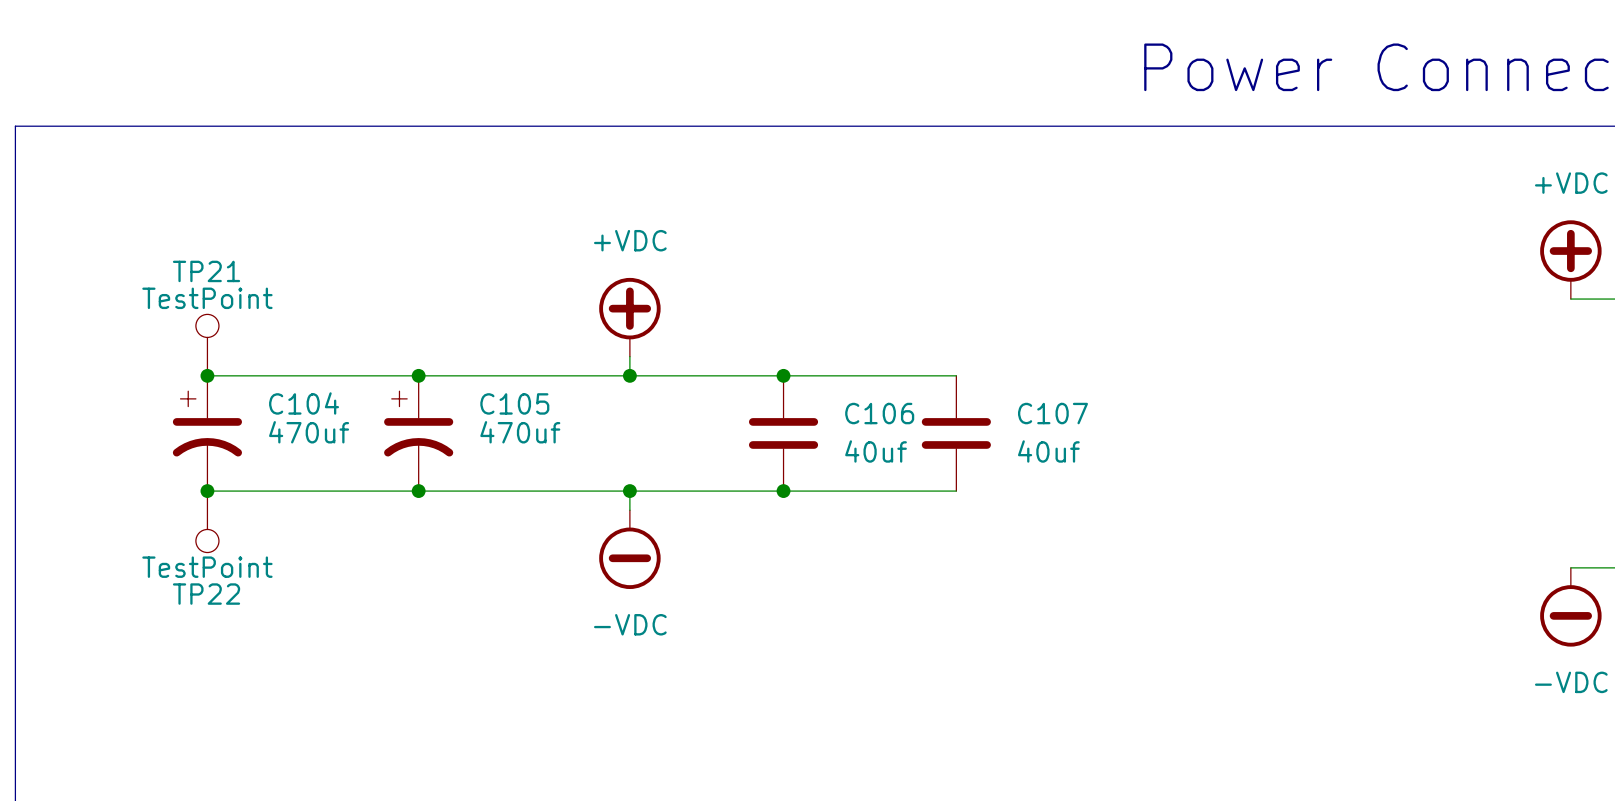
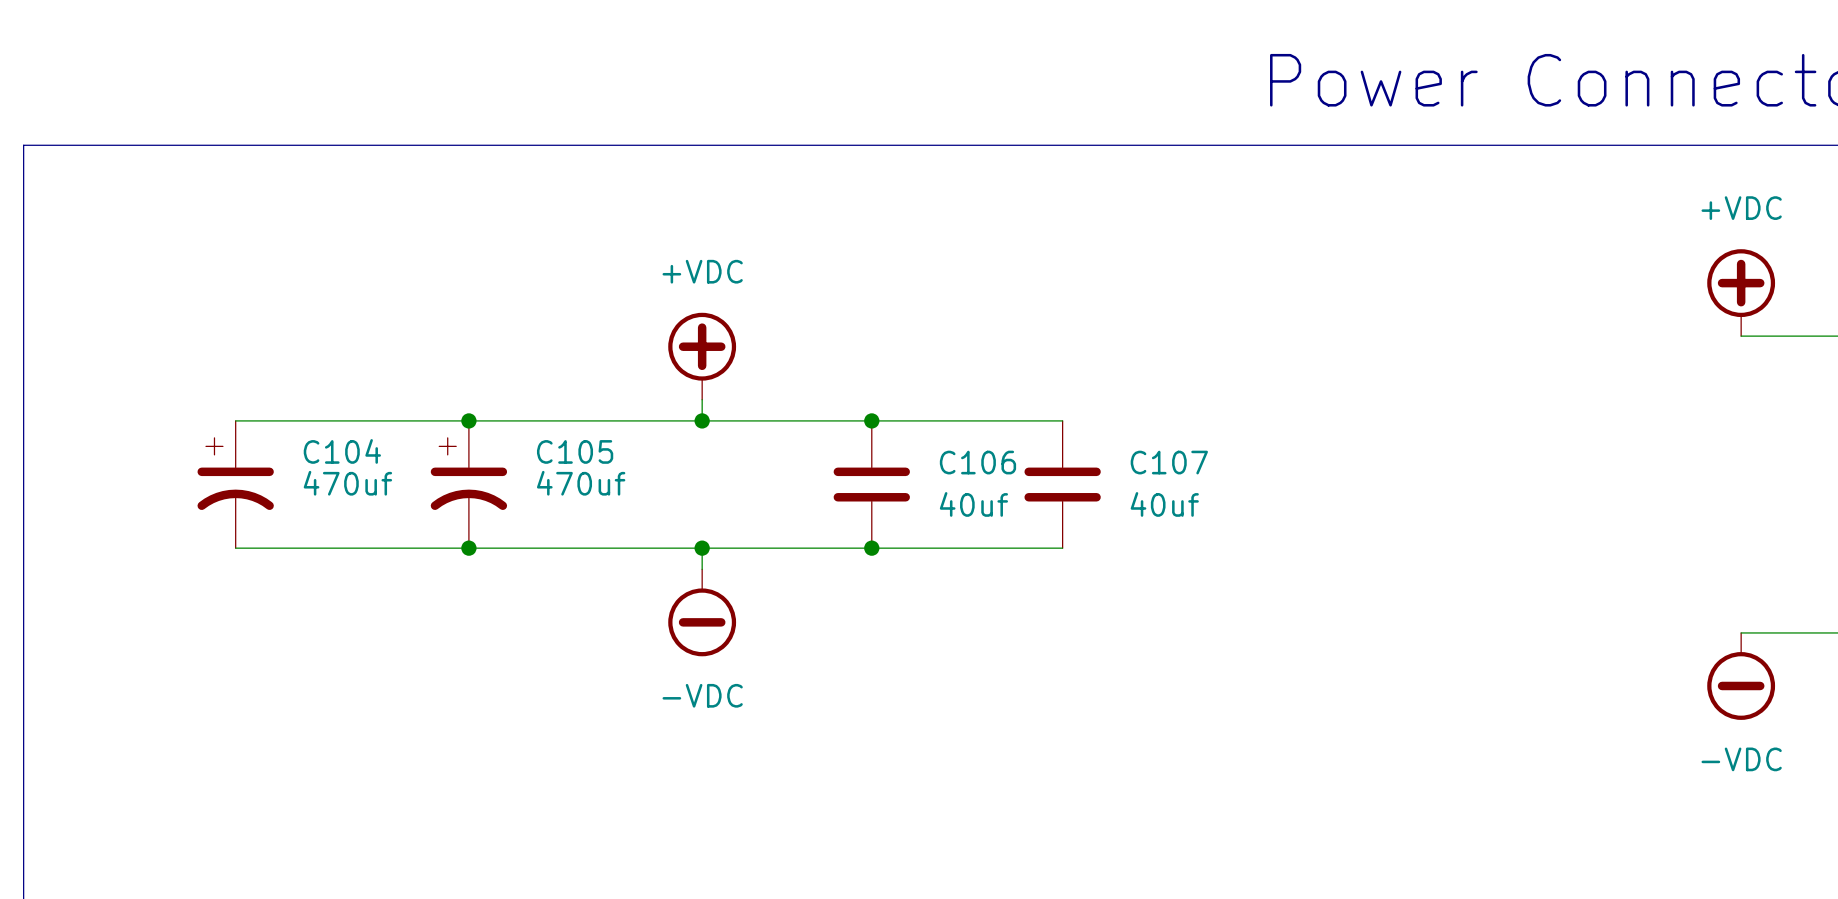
TP21: TestPoint (207, 345) -> none
junction: (207, 375) -> none
junction: (207, 491) -> none
TP22: TestPoint (207, 521) -> none

